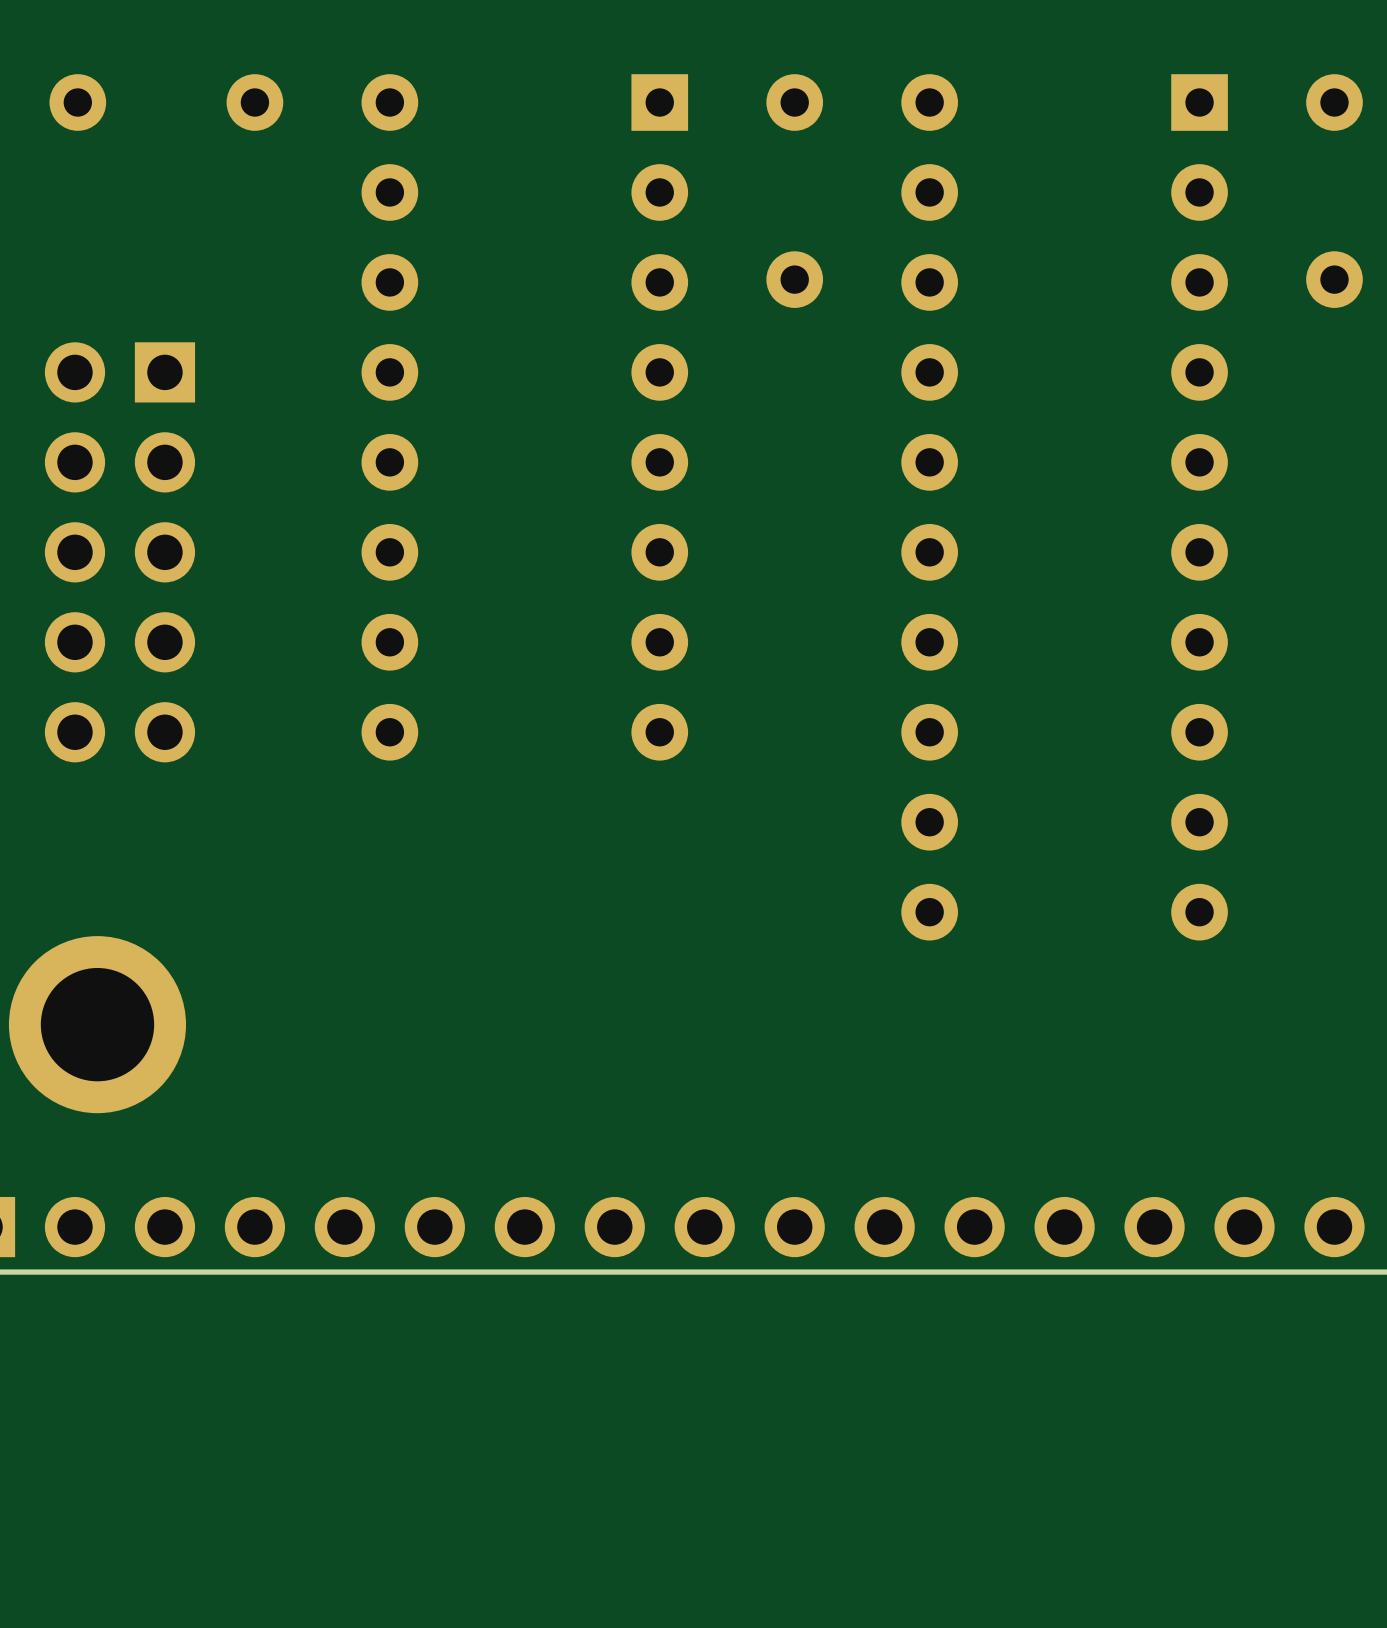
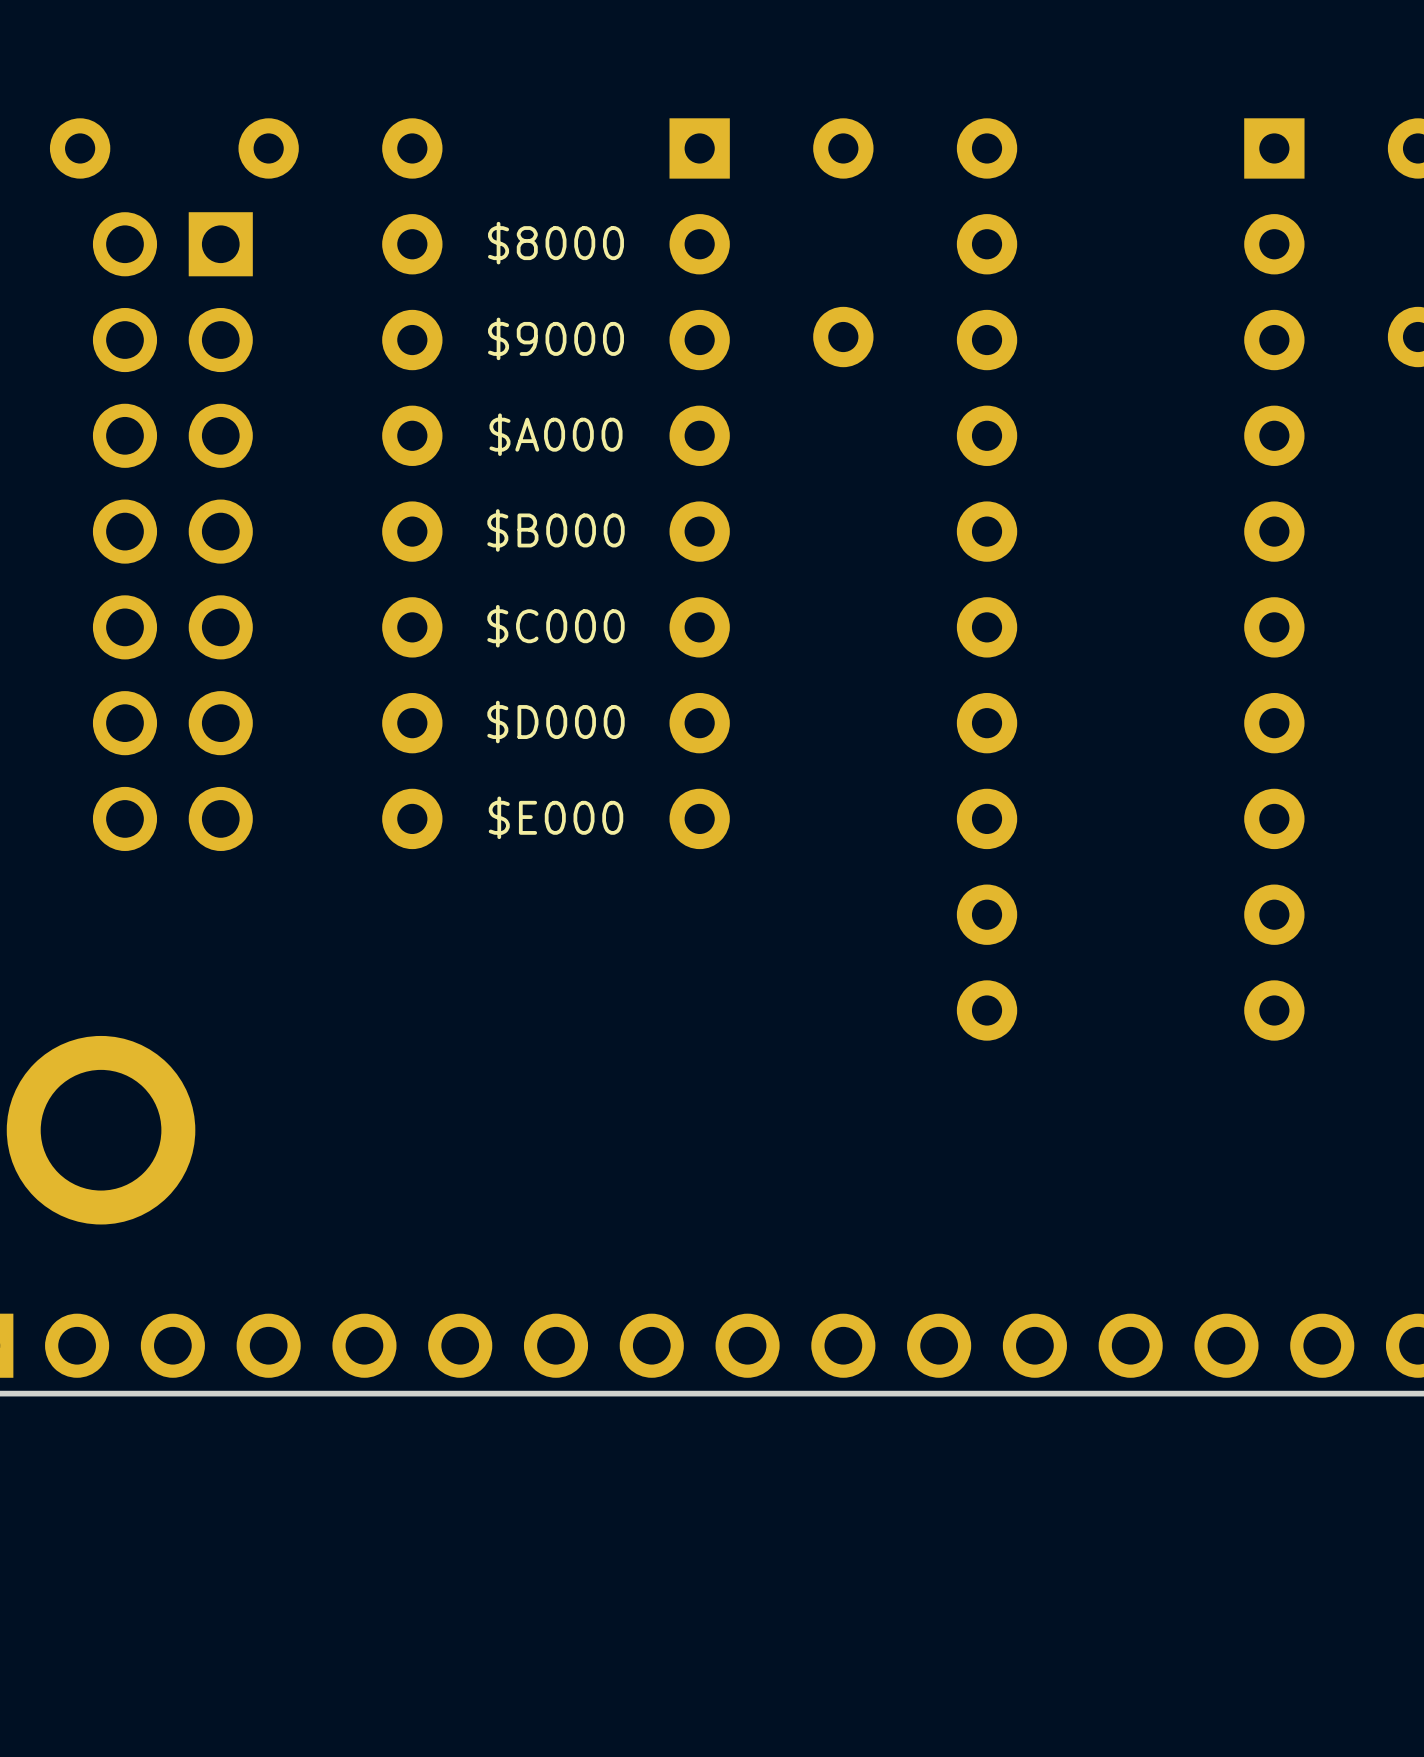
text: none -> $8000 (556, 243)
text: none -> $9000 (556, 338)
text: none -> $A000 (556, 434)
part: none -> (172, 531)
text: none -> $B000 (556, 530)
part: (119, 552) -> none
text: none -> $C000 (556, 626)
text: none -> $D000 (556, 722)
text: none -> $E000 (556, 817)

